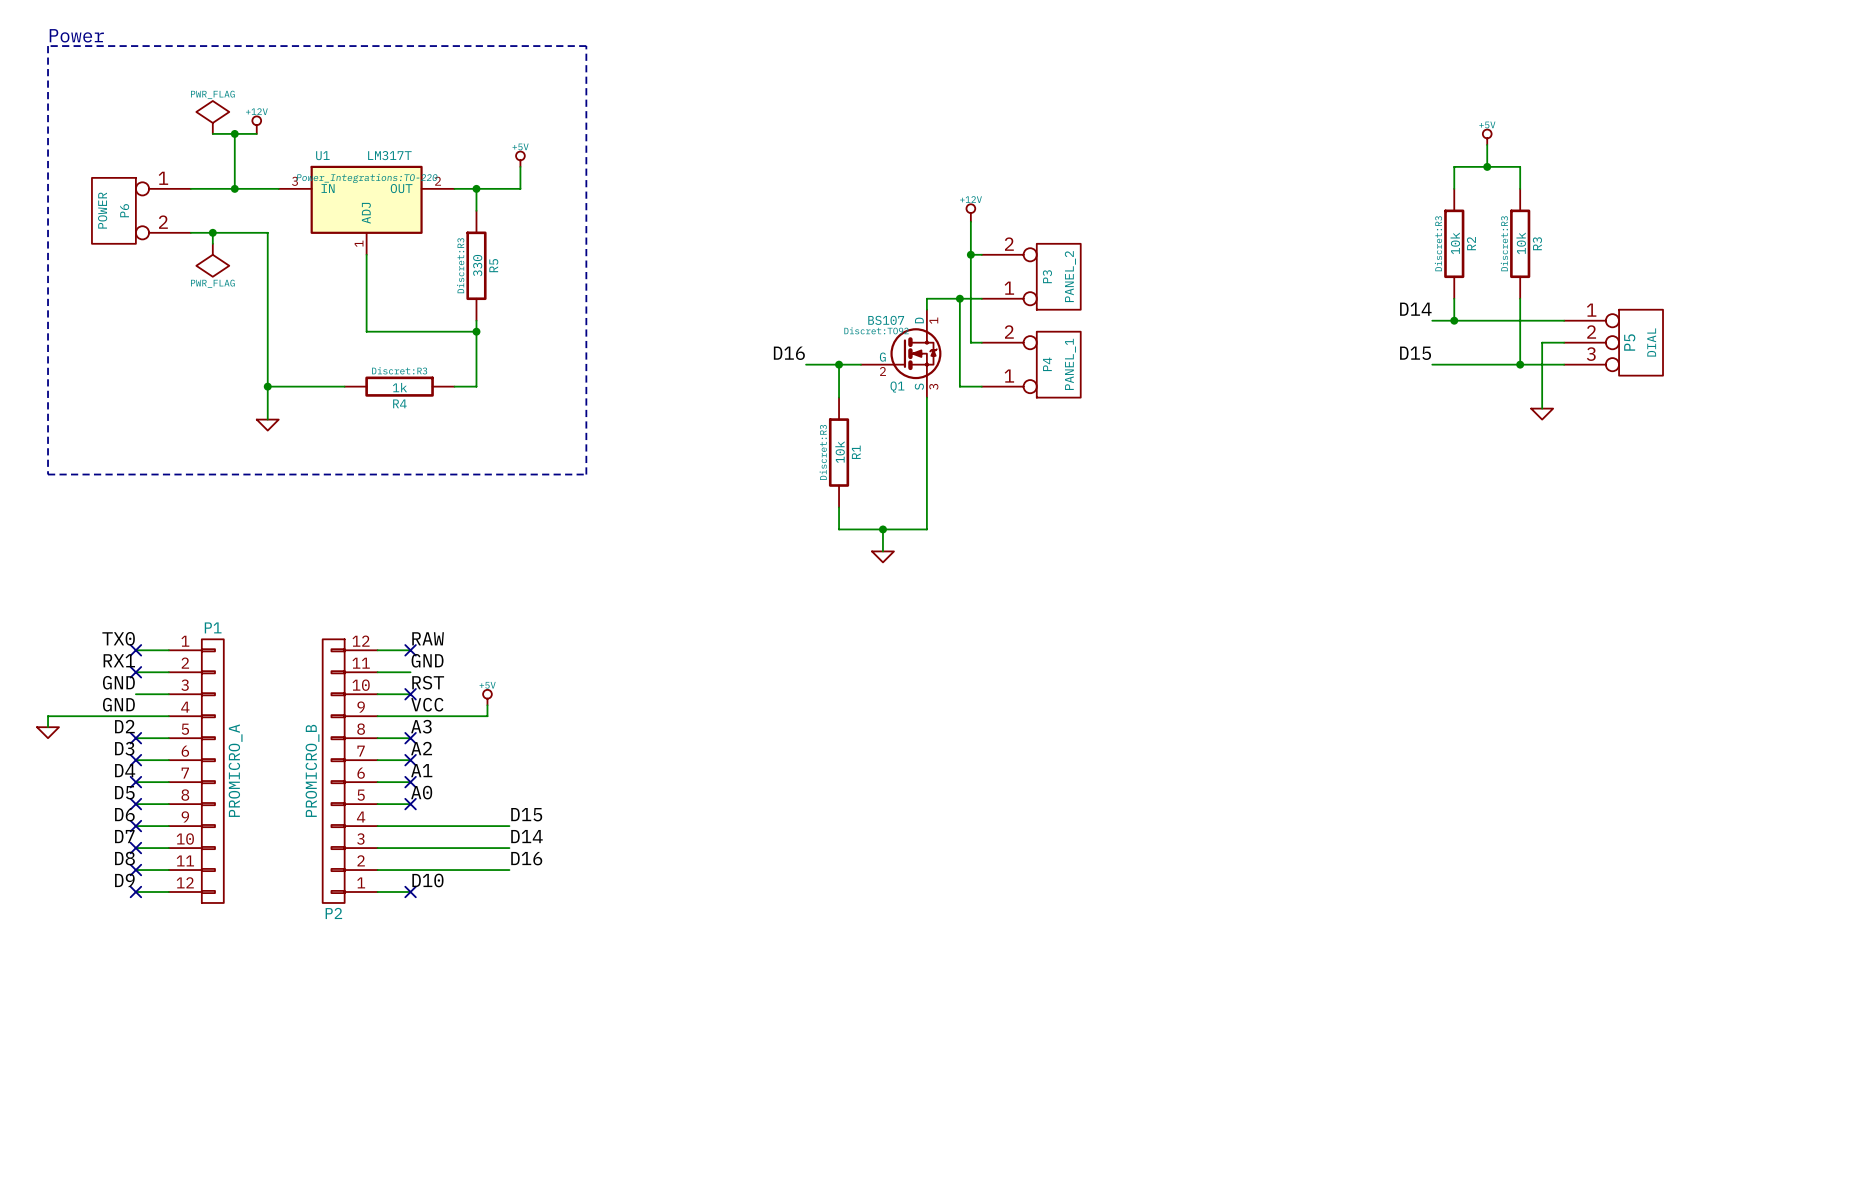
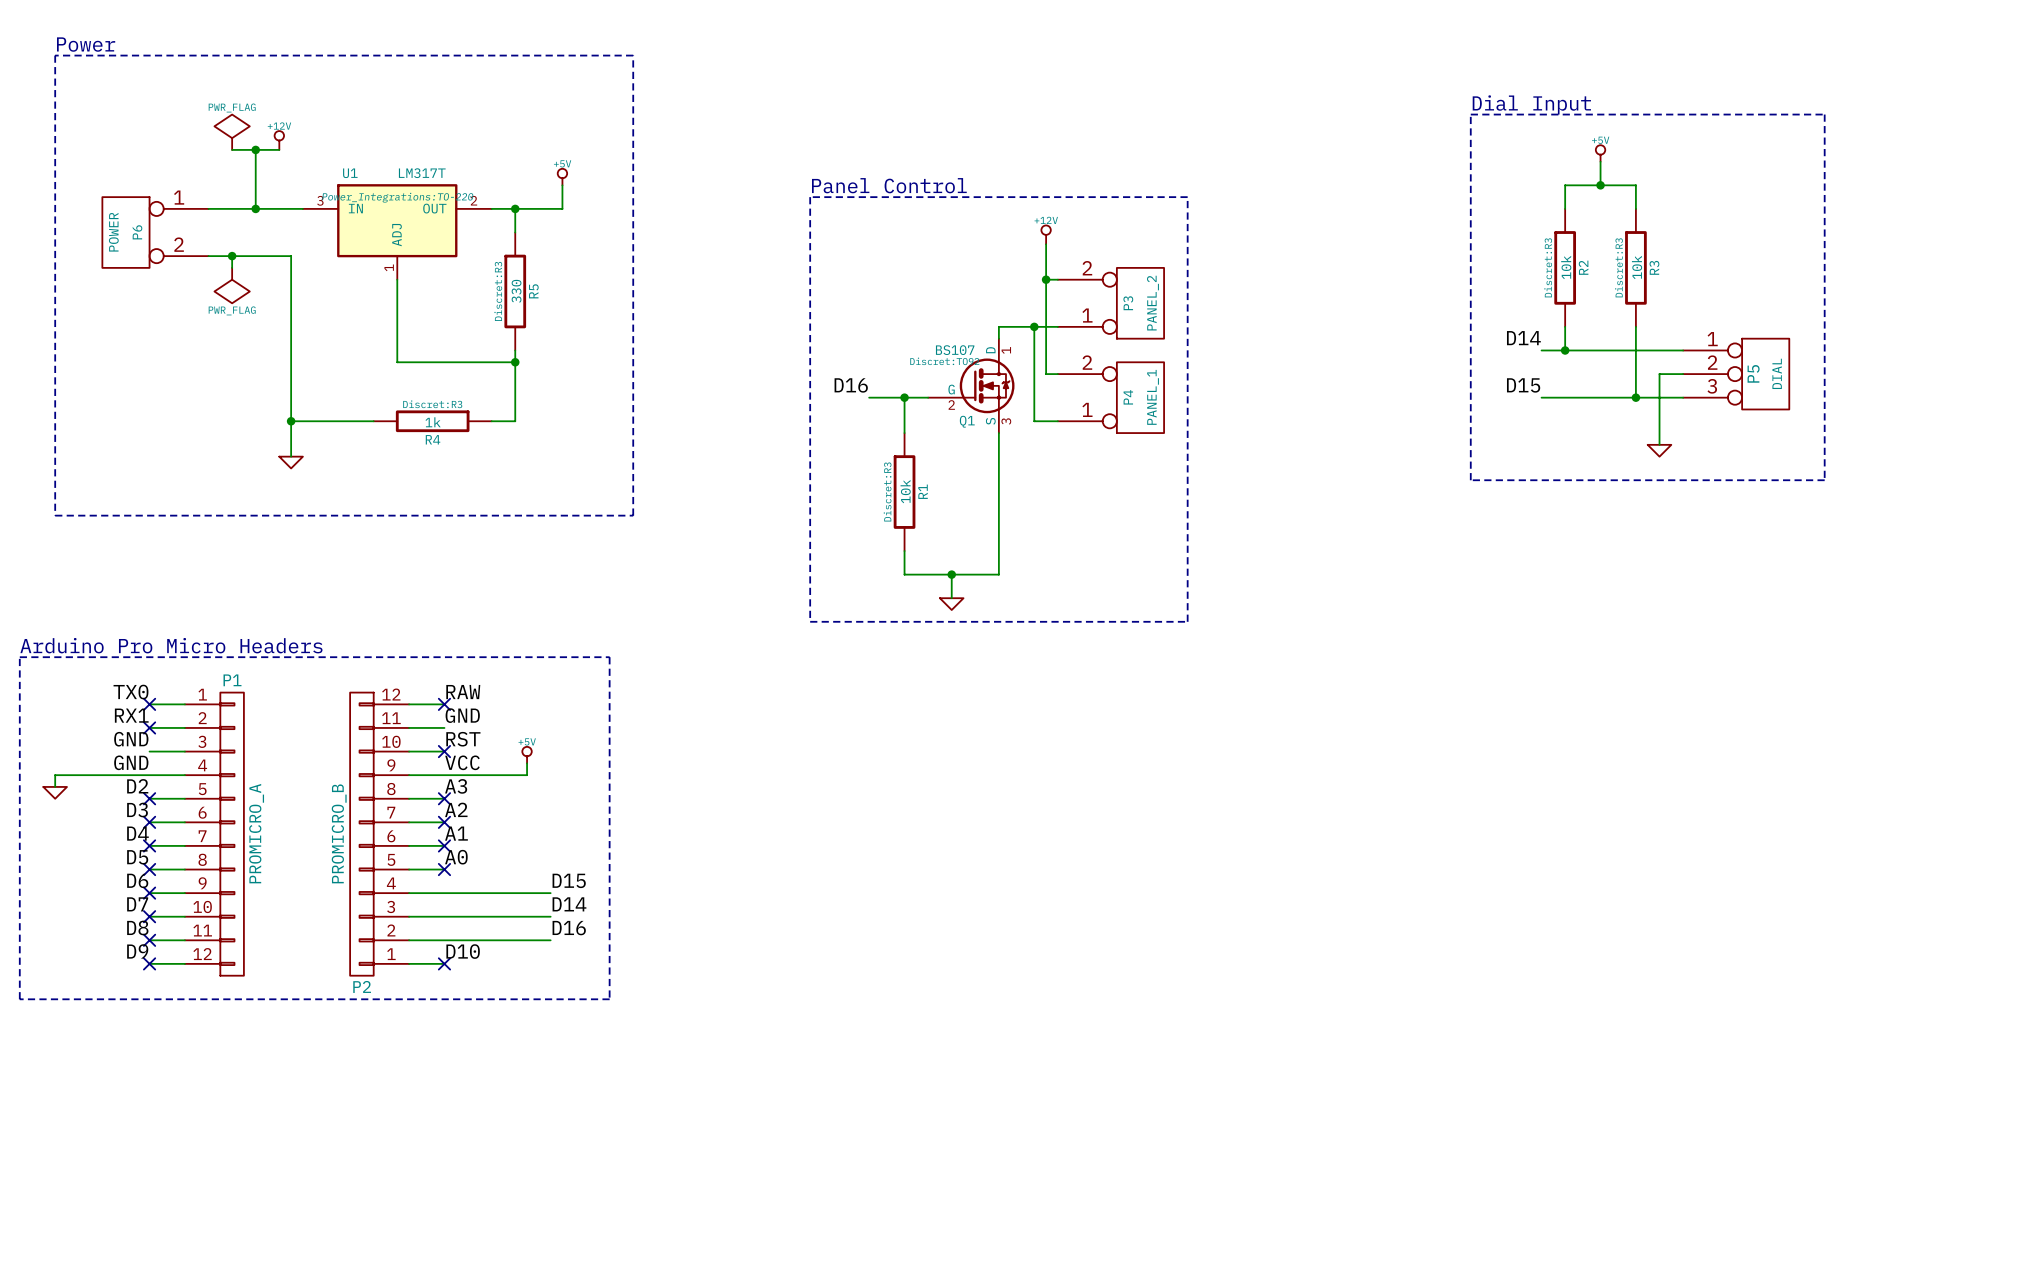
text: none -> Dial Input (1531, 104)
line: none -> (1470, 114) (1824, 114) (1824, 480) (1470, 480) (1470, 114)
text: none -> Panel Control (889, 185)
line: none -> (810, 197) (810, 621) (1187, 621) (1187, 197) (810, 197)
text: none -> Arduino Pro Micro Headers (171, 645)
line: none -> (19, 657) (609, 657) (609, 999) (19, 999) (19, 657)

